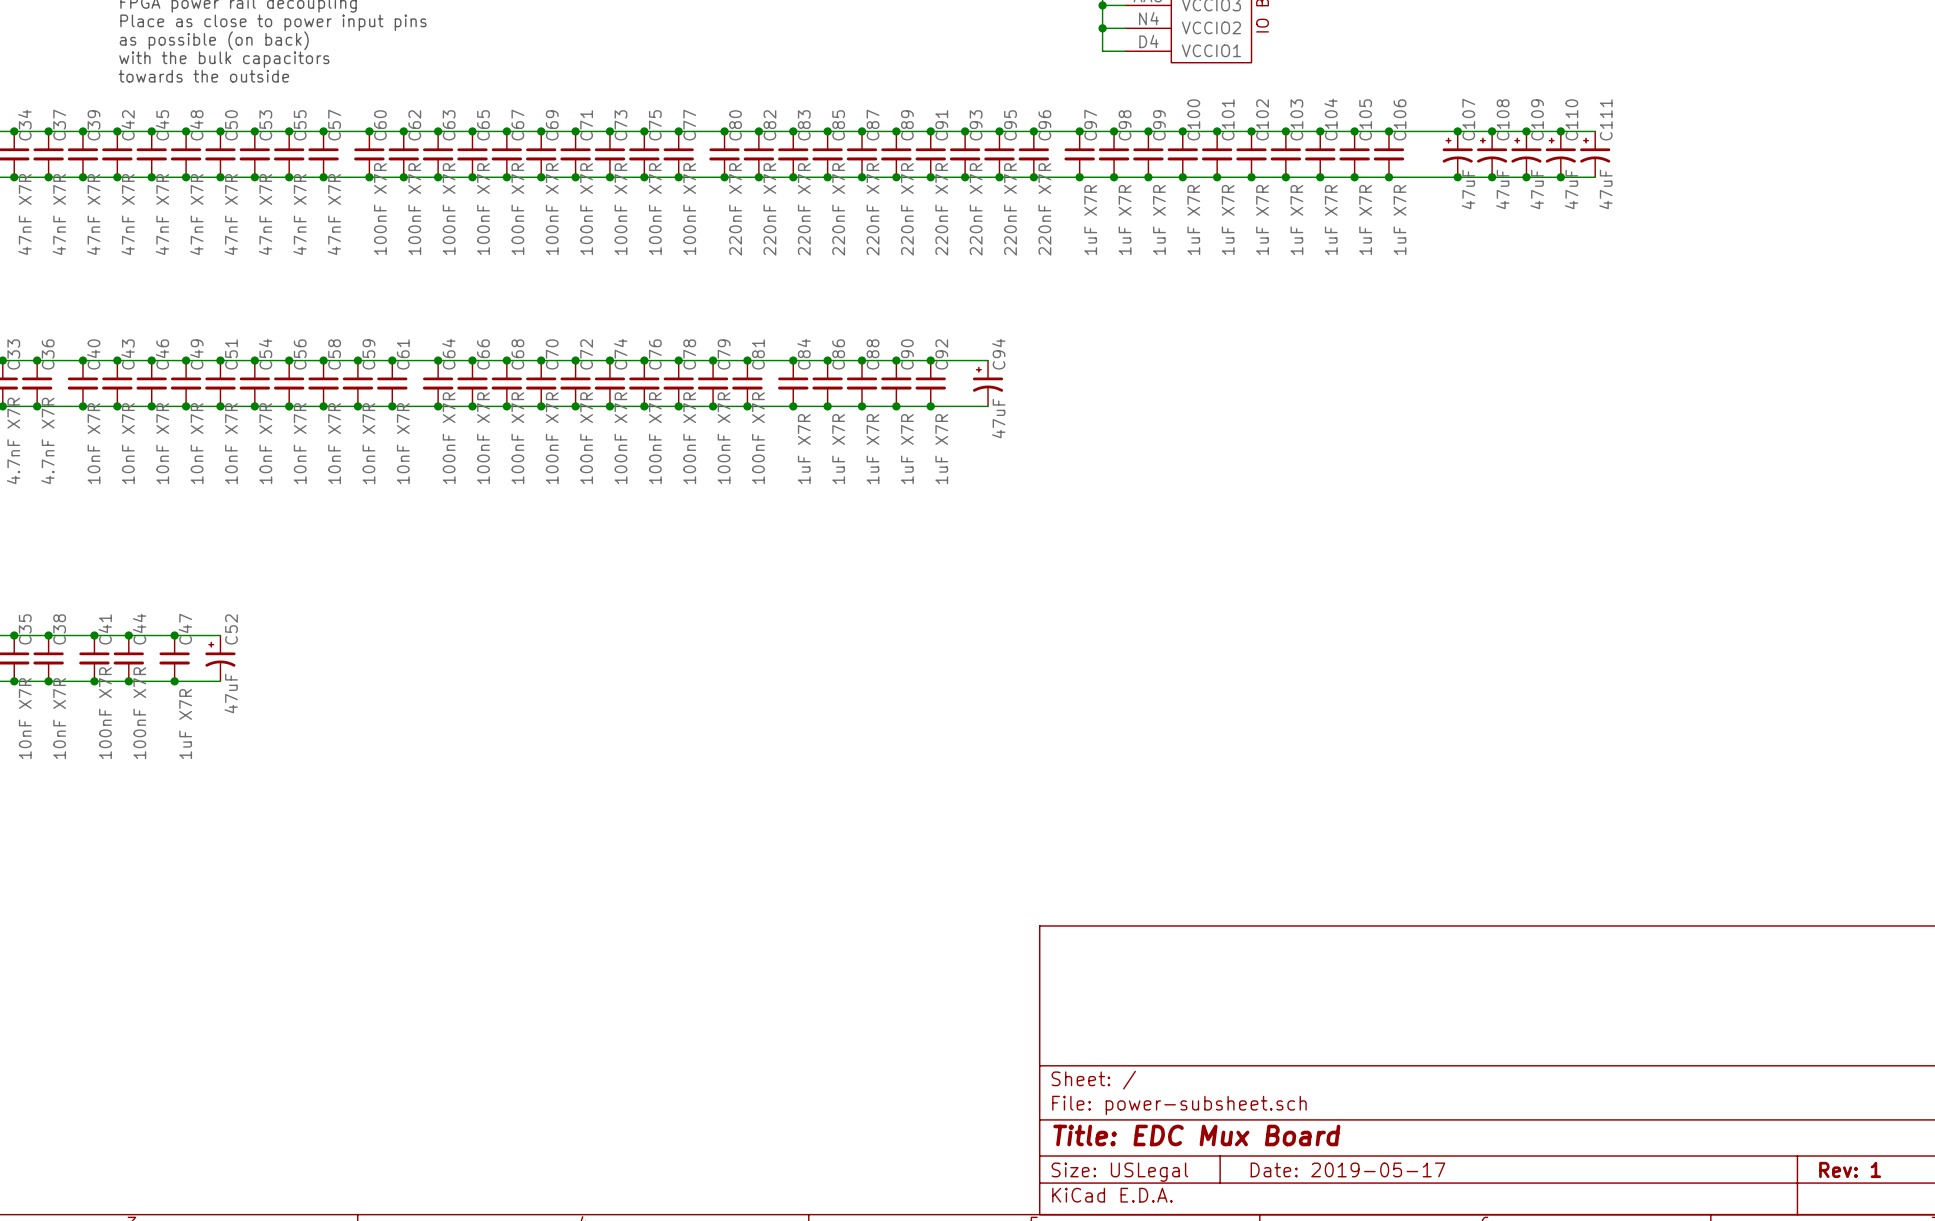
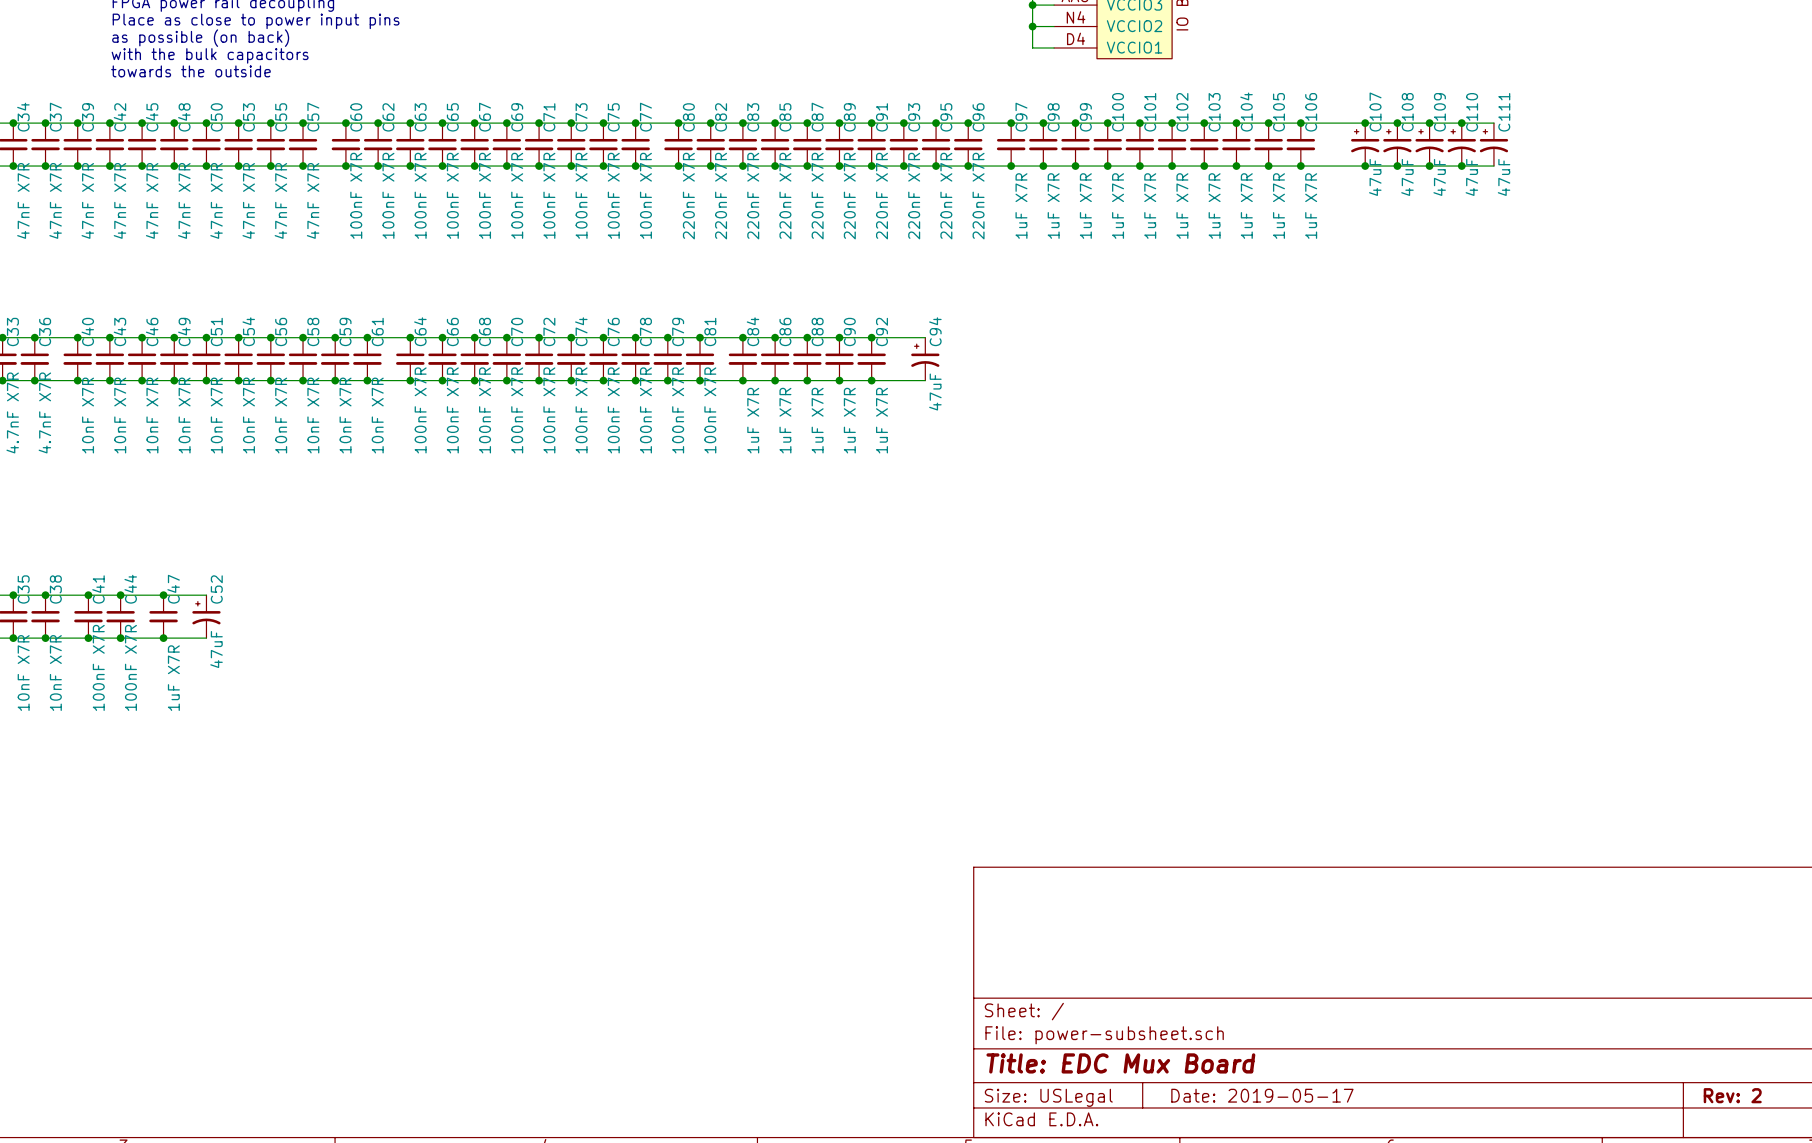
title block: Rev: 1 (1850, 1169) -> Rev: 2 (1732, 1095)

